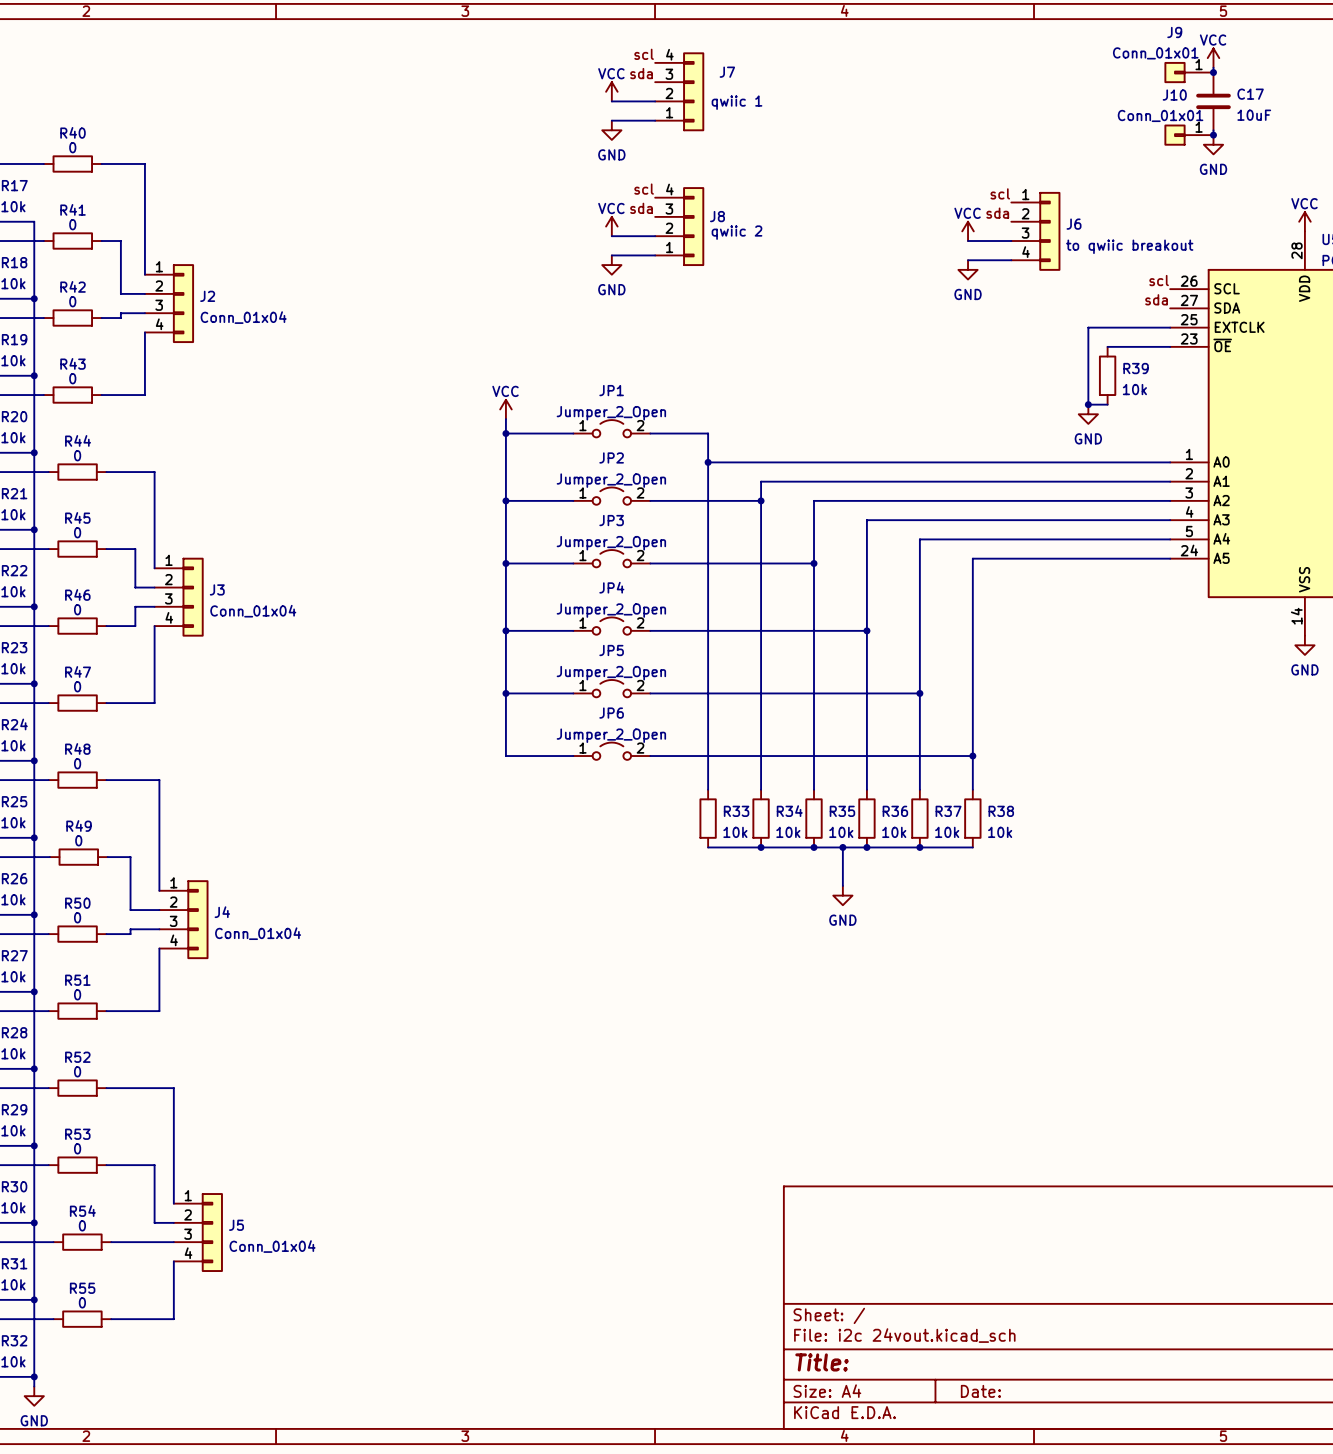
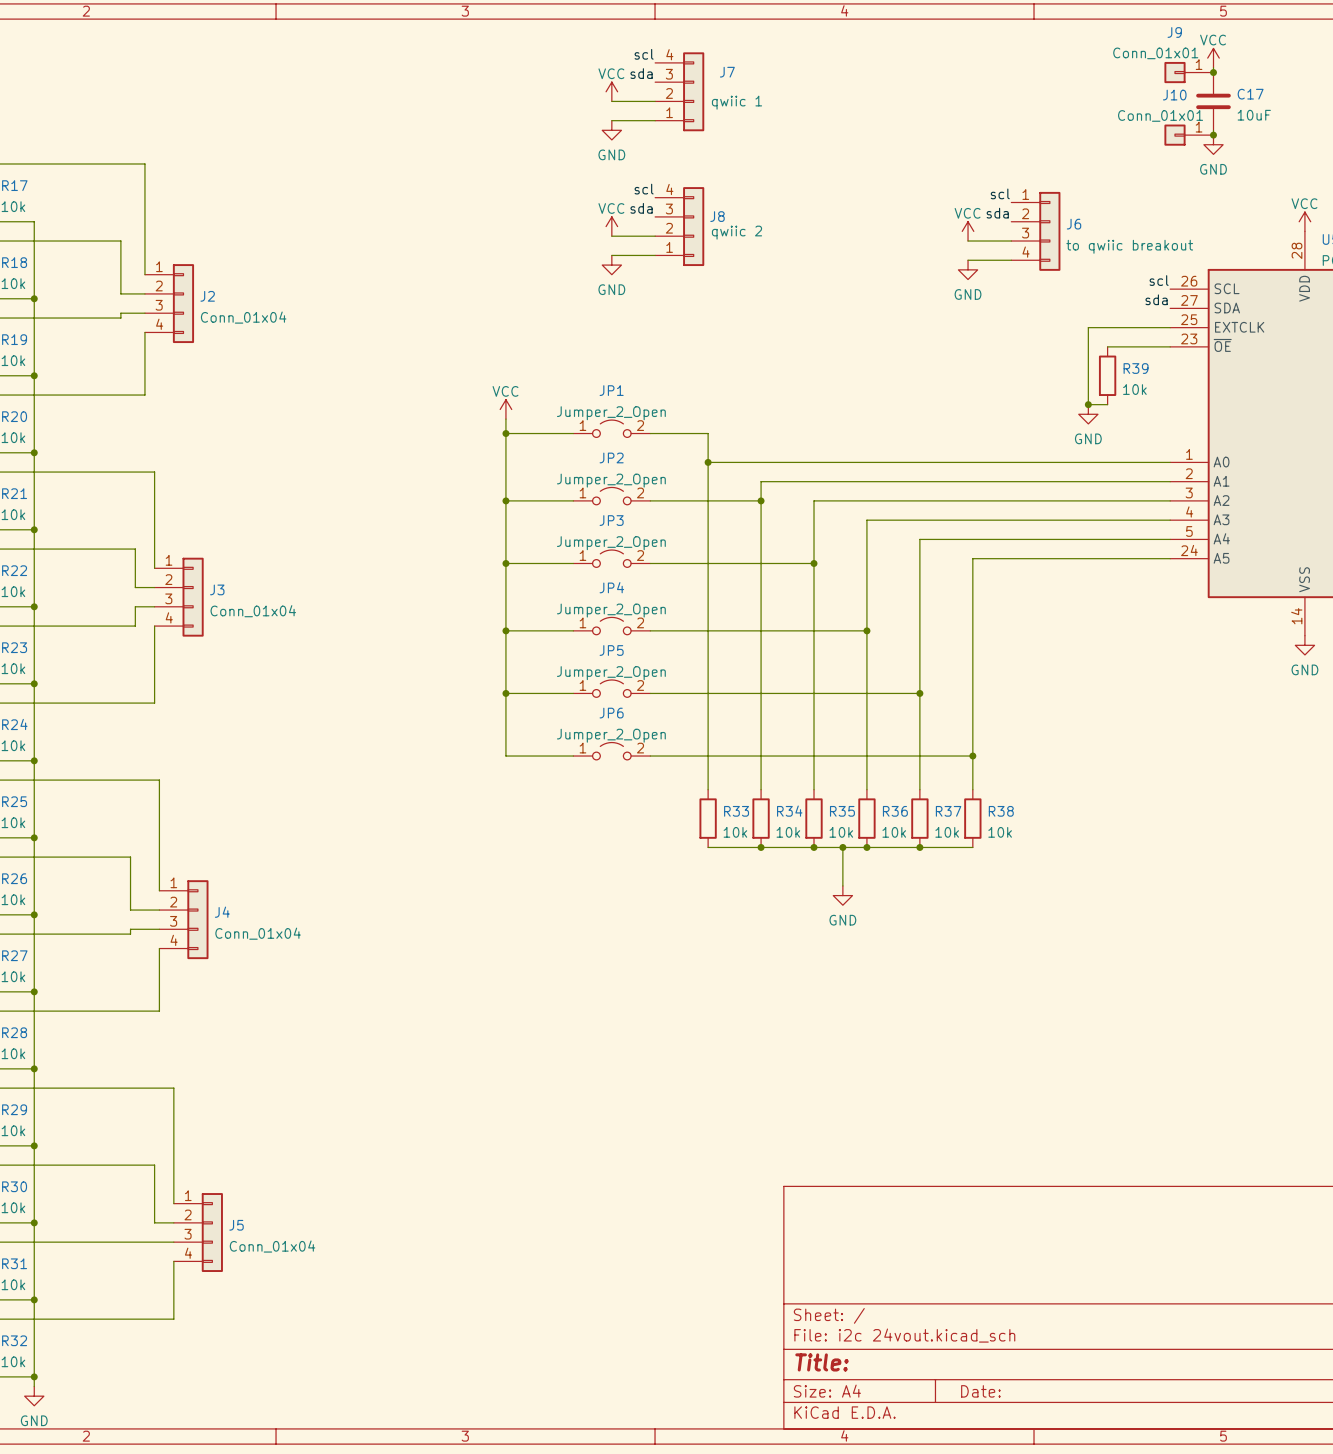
wire: none -> (43, 163) (101, 163)
R40: 0 (72, 163) -> none
wire: none -> (43, 241) (101, 241)
R41: 0 (72, 241) -> none
wire: none -> (43, 318) (101, 318)
R42: 0 (72, 318) -> none
wire: none -> (43, 395) (101, 395)
R43: 0 (72, 395) -> none
wire: none -> (48, 472) (106, 472)
R44: 0 (77, 472) -> none
wire: none -> (48, 549) (106, 549)
R45: 0 (77, 549) -> none
wire: none -> (48, 626) (106, 626)
R46: 0 (77, 626) -> none
wire: none -> (48, 703) (106, 703)
R47: 0 (77, 703) -> none
wire: none -> (48, 780) (106, 780)
R48: 0 (77, 780) -> none
wire: none -> (49, 857) (107, 857)
R49: 0 (78, 857) -> none
wire: none -> (48, 934) (106, 934)
R50: 0 (77, 934) -> none
wire: none -> (48, 1011) (106, 1011)
R51: 0 (77, 1011) -> none
wire: none -> (48, 1088) (106, 1088)
R52: 0 (77, 1088) -> none
wire: none -> (48, 1165) (106, 1165)
R53: 0 (77, 1165) -> none
wire: none -> (53, 1242) (111, 1242)
R54: 0 (82, 1242) -> none
wire: none -> (53, 1319) (111, 1319)
R55: 0 (82, 1319) -> none

